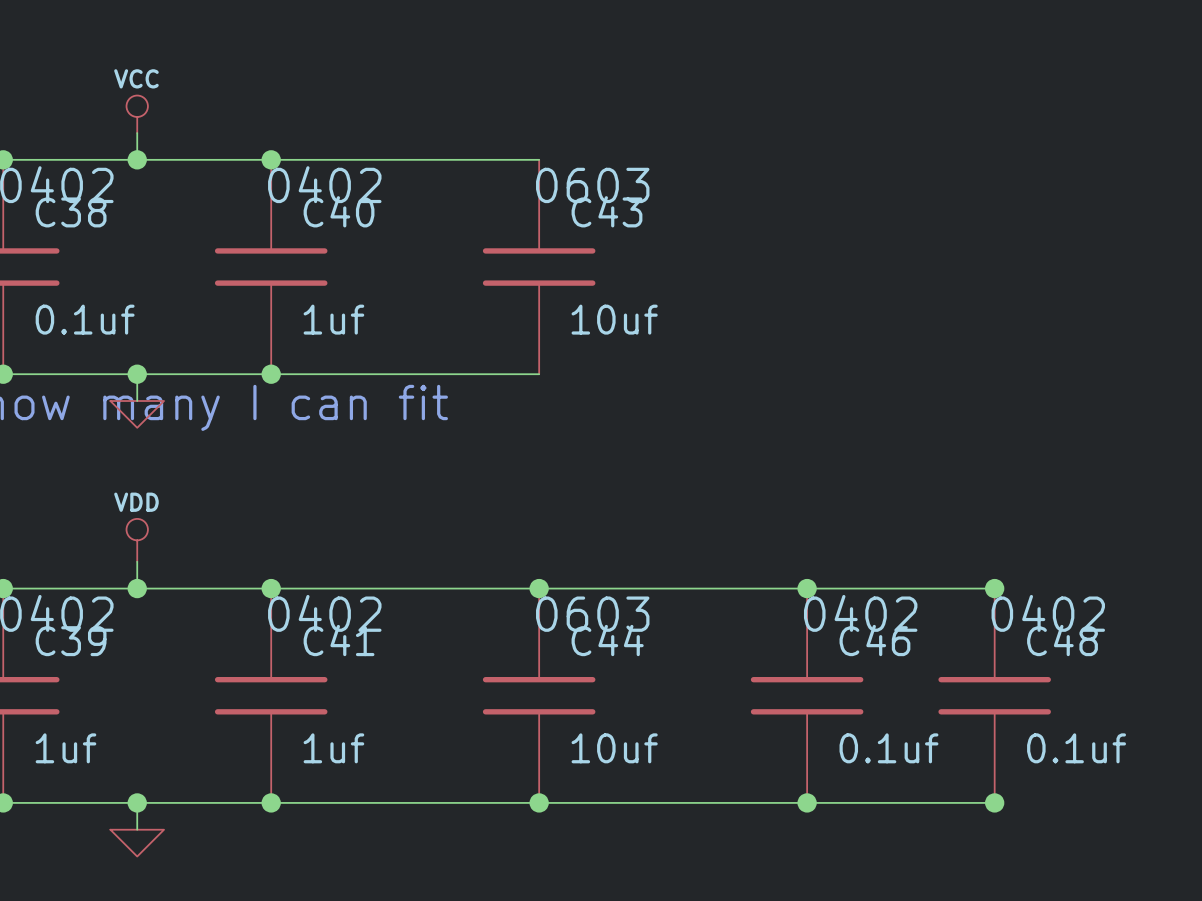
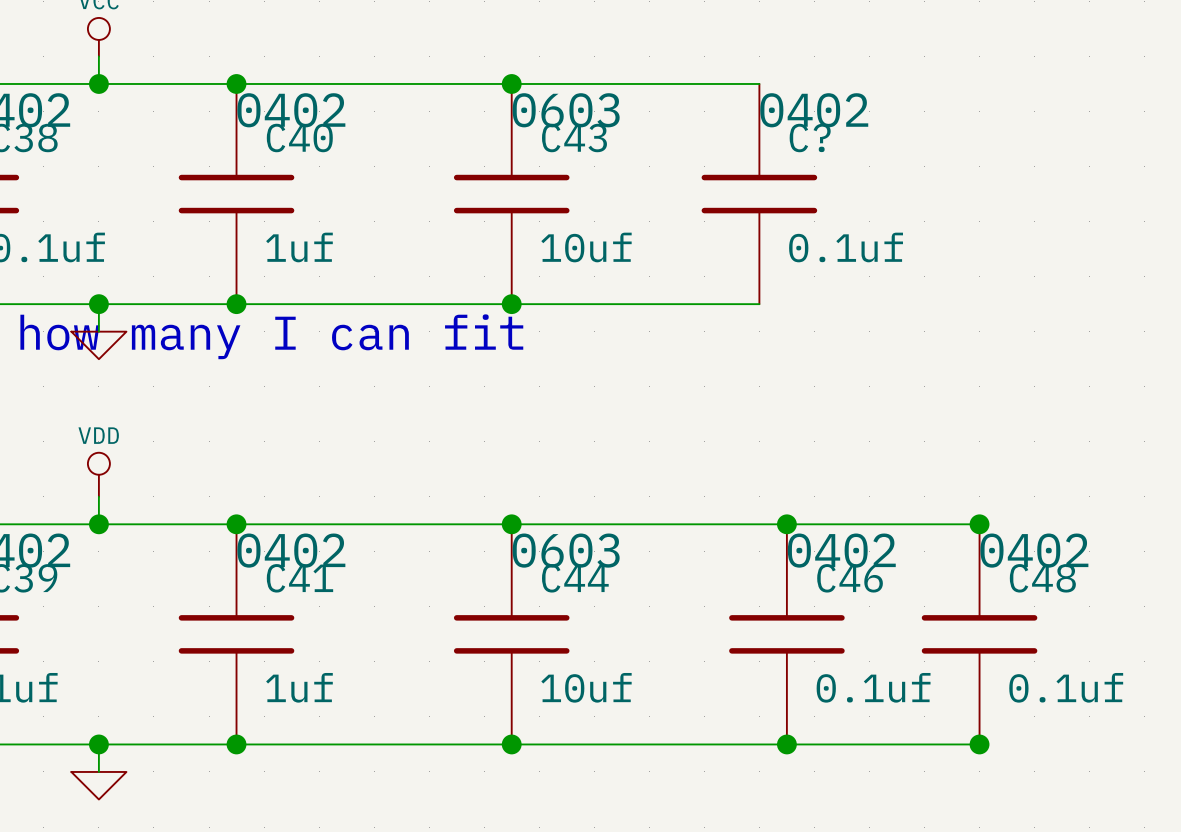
wire: none -> (511, 83) (759, 83)
junction: none -> (511, 83)
C?: none -> 0.1uf (759, 194)
wire: none -> (511, 304) (759, 304)
junction: none -> (511, 304)

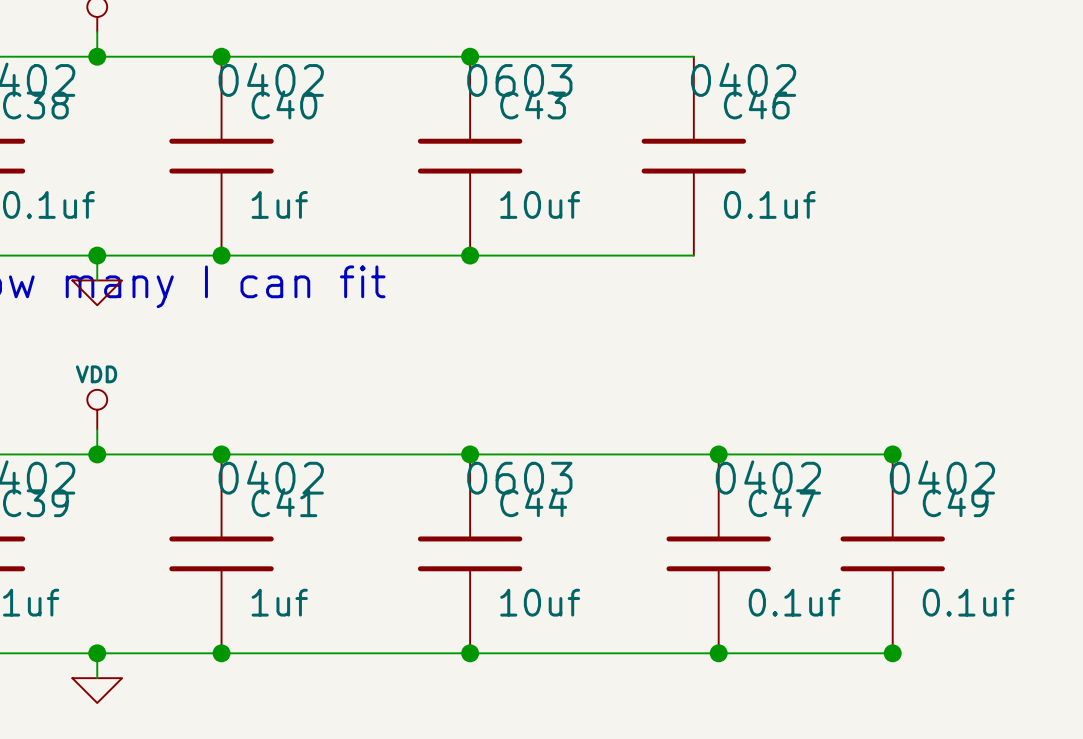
C? name: C? (810, 138) -> C46 (756, 104)
C46 name: C46 (850, 578) -> C47 (782, 502)
C48 name: C48 (1042, 578) -> C49 (955, 502)

